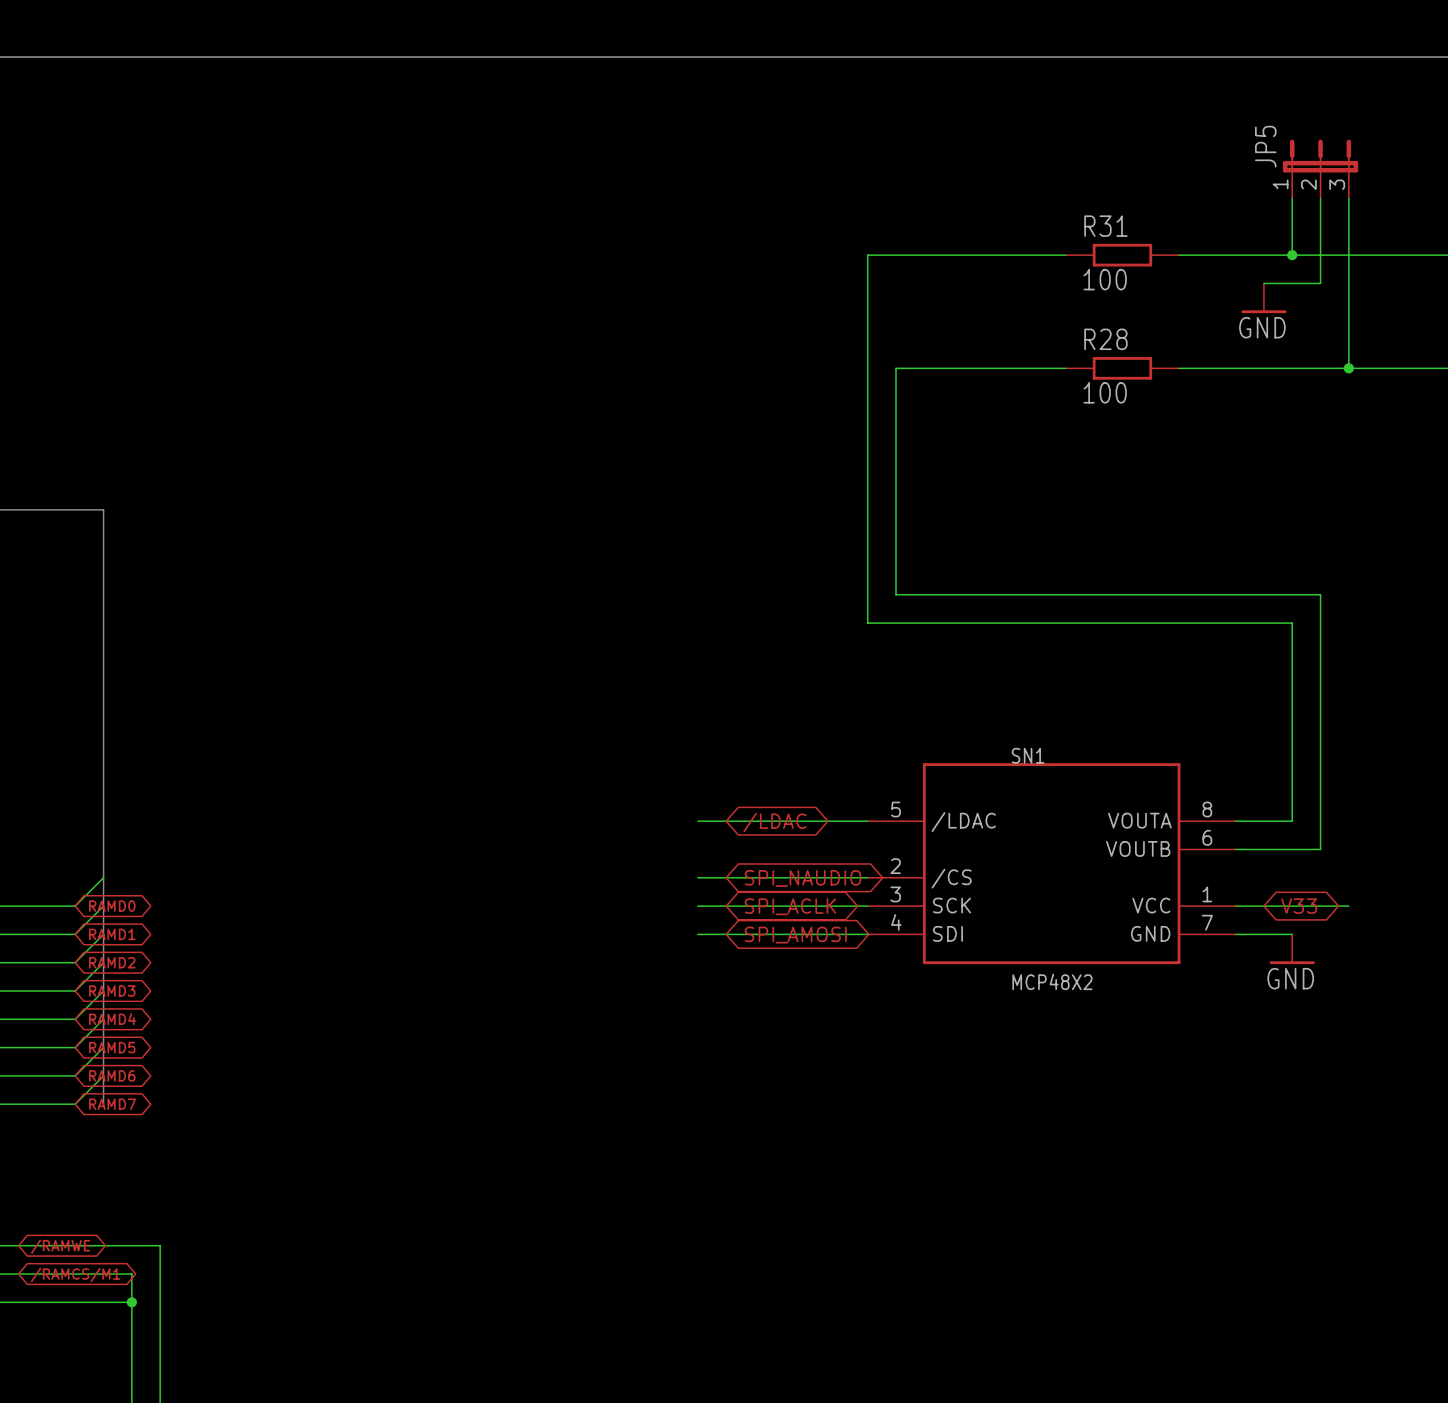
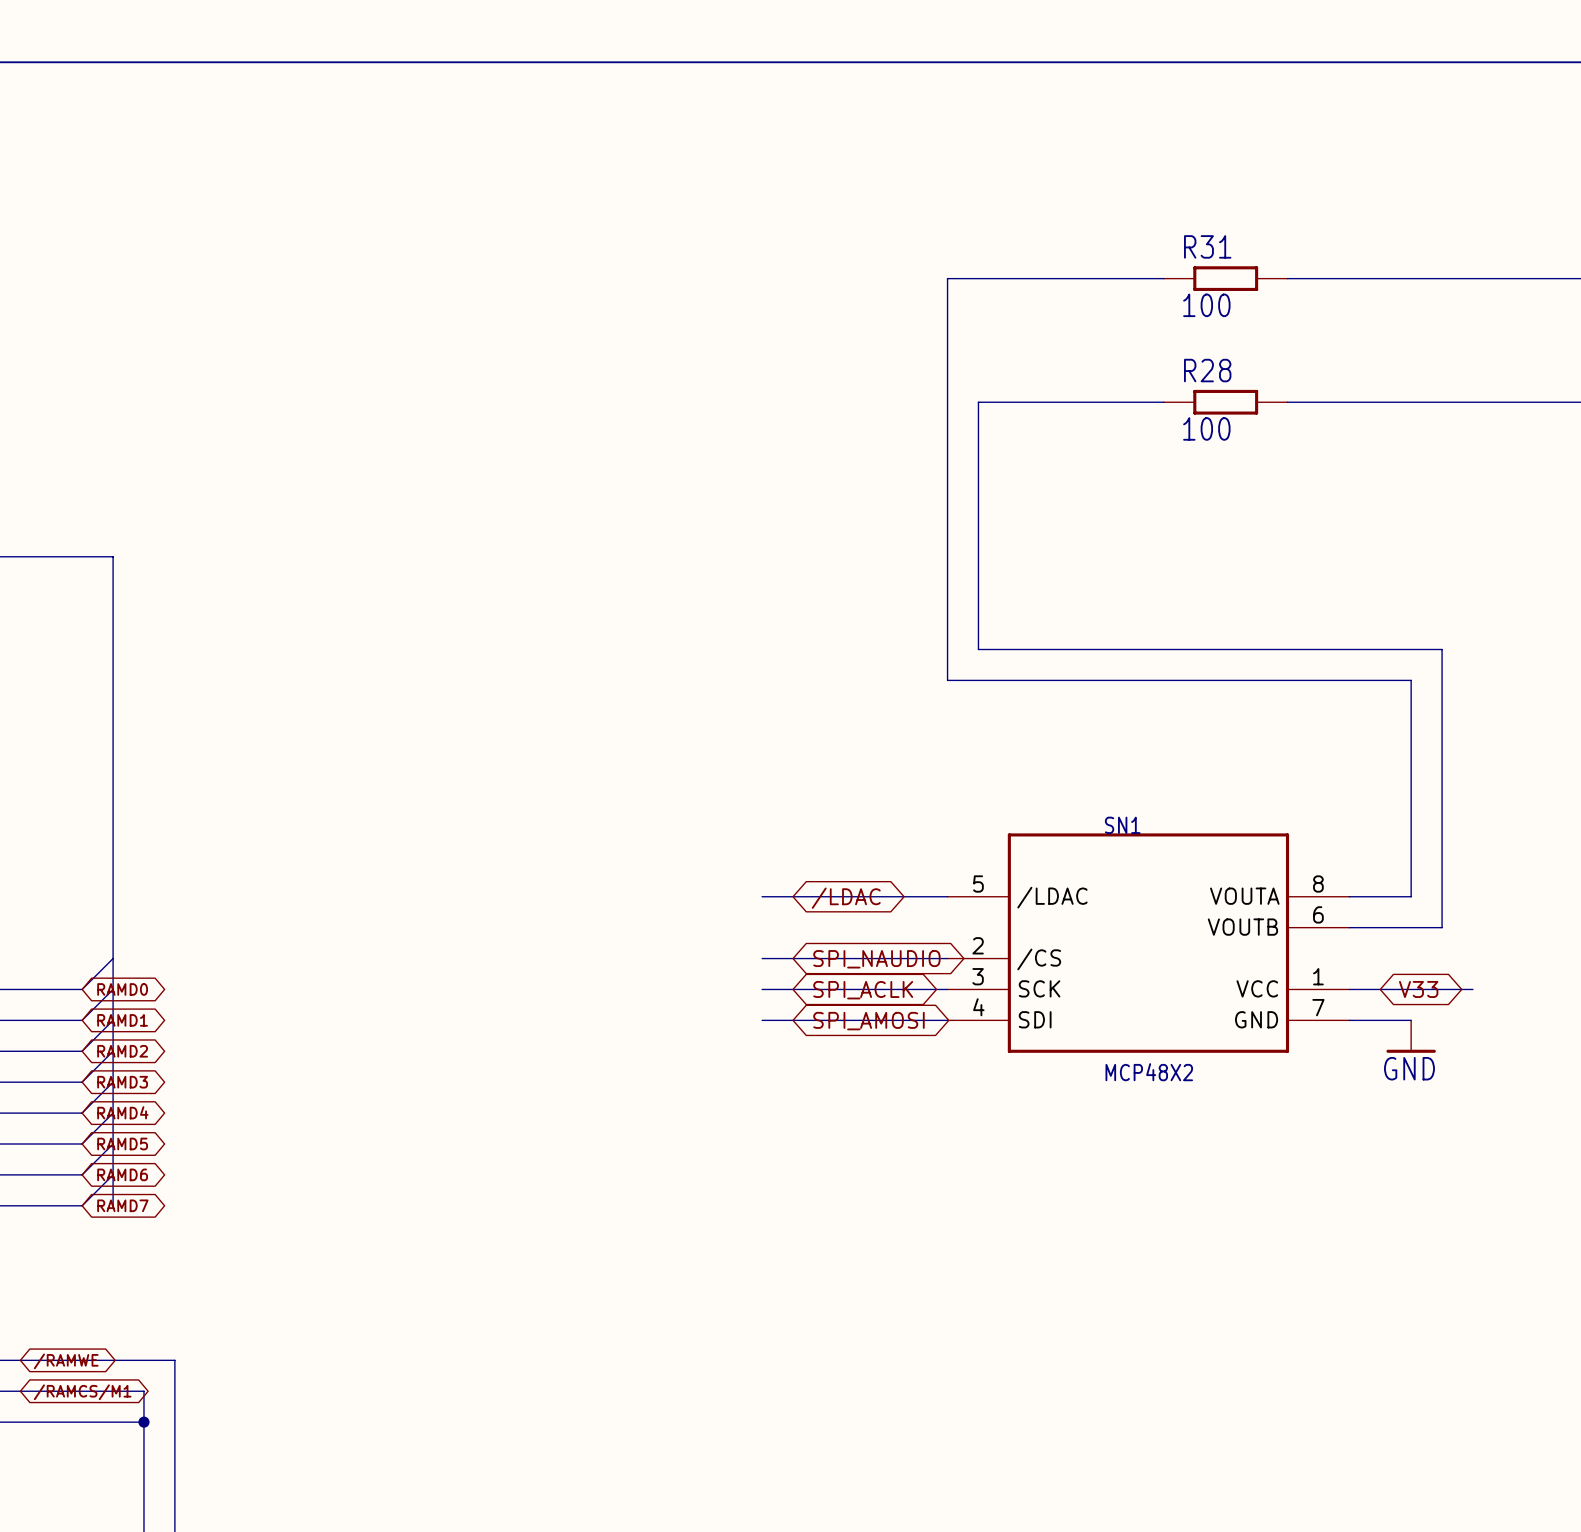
JP5: (1320, 169) -> none
wire: (1292, 198) (1292, 255) -> none
wire: (1320, 198) (1320, 283) (1263, 283) -> none
wire: (1348, 198) (1348, 368) -> none
junction: (1292, 255) -> none
power symbol: GND (1263, 298) -> none
junction: (1348, 368) -> none

